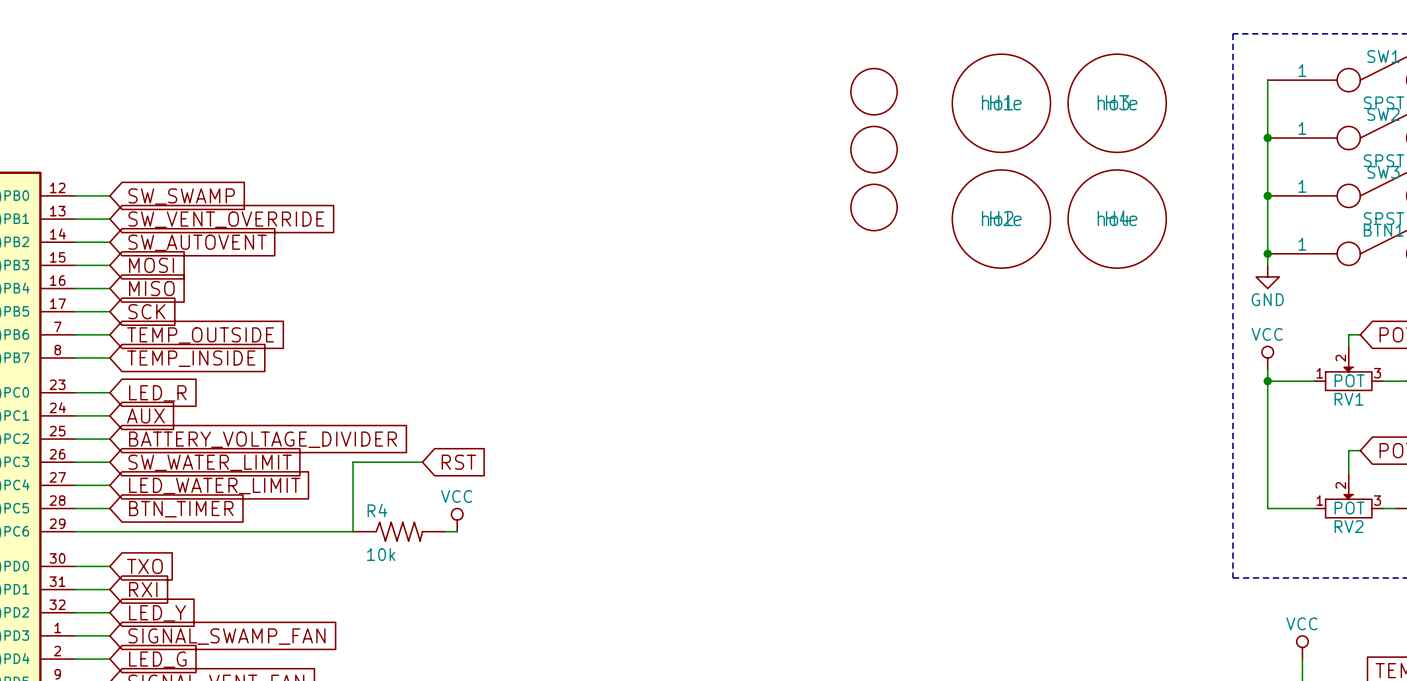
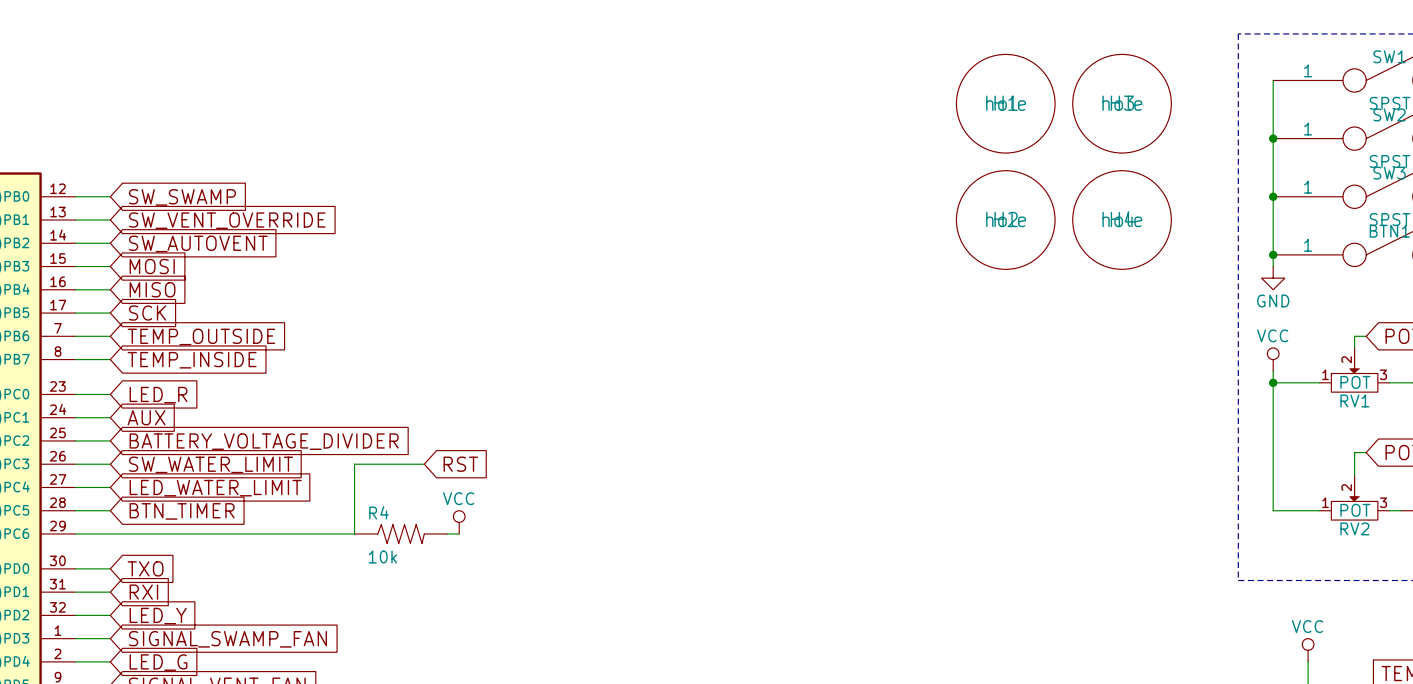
part: (874, 91) -> none
part: (874, 149) -> none
part: (874, 207) -> none

